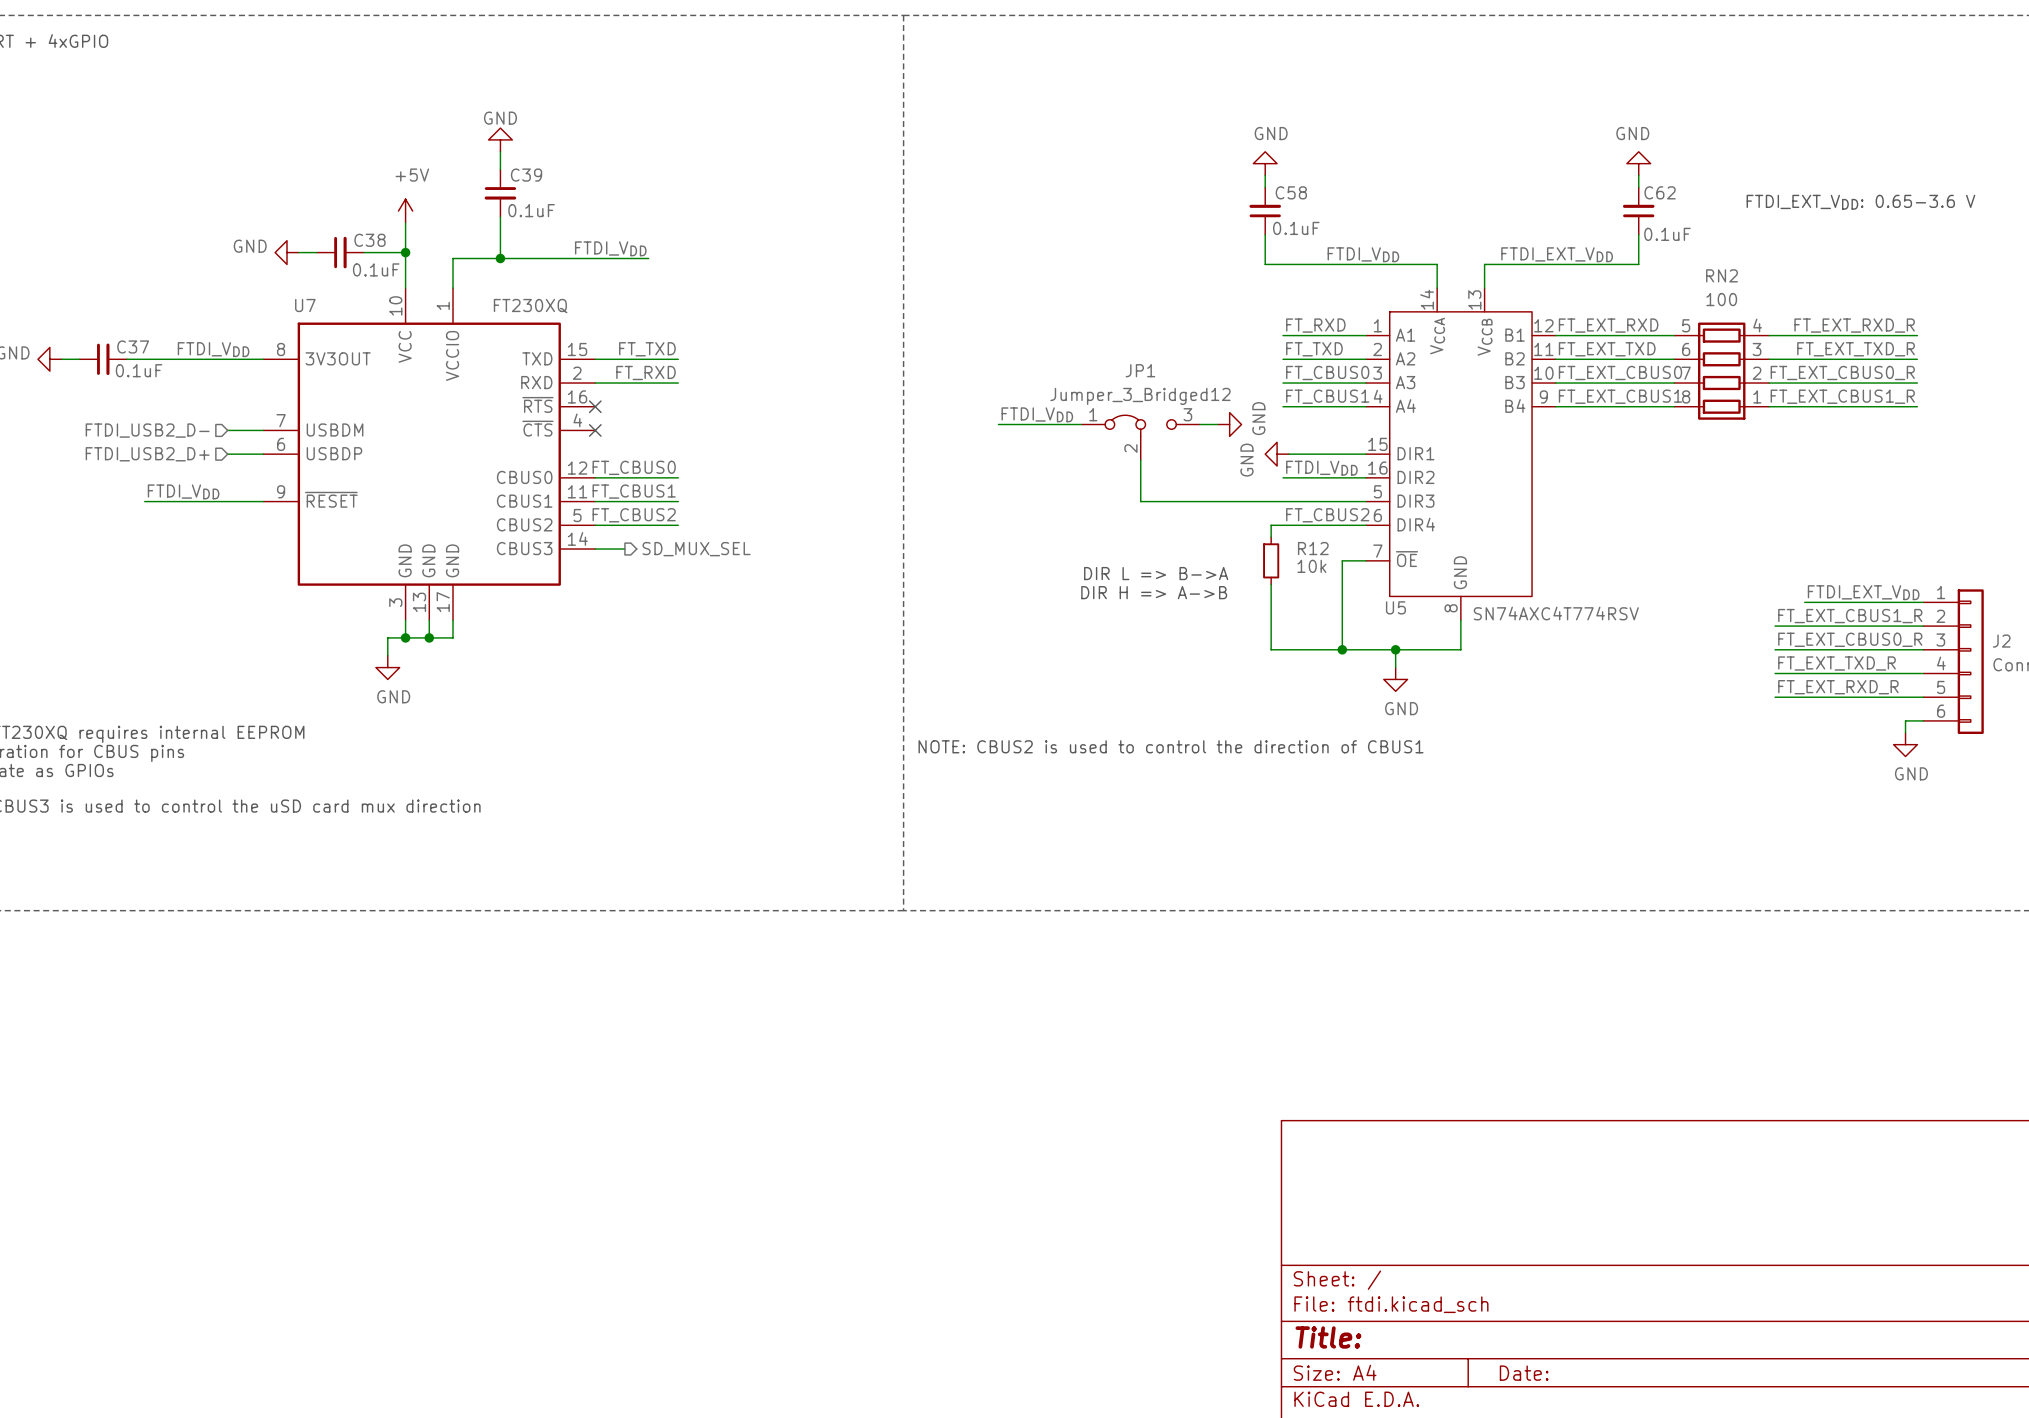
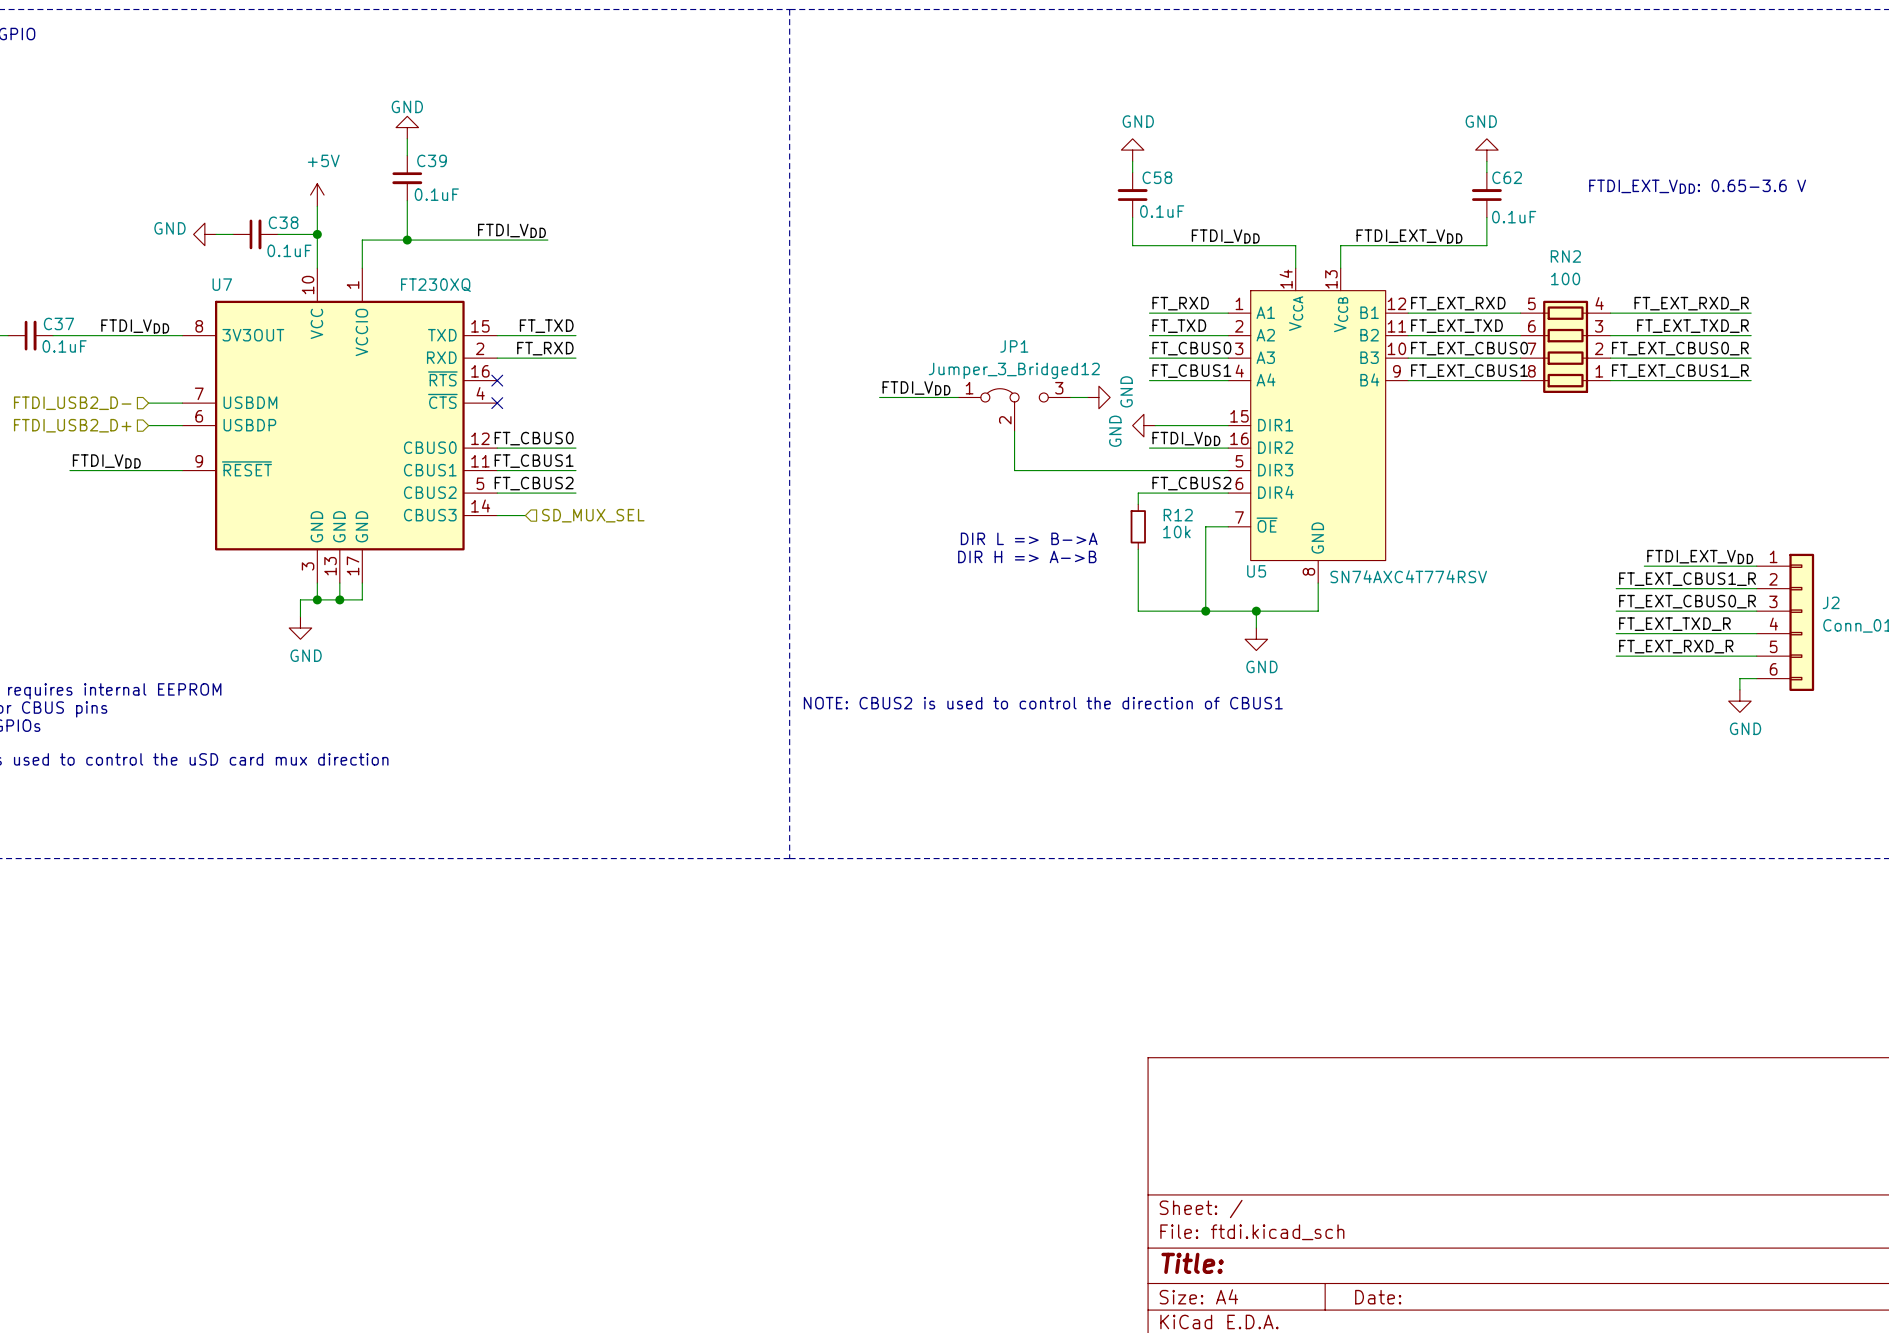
hierarchical label shape: output (696, 549) -> input (593, 515)

